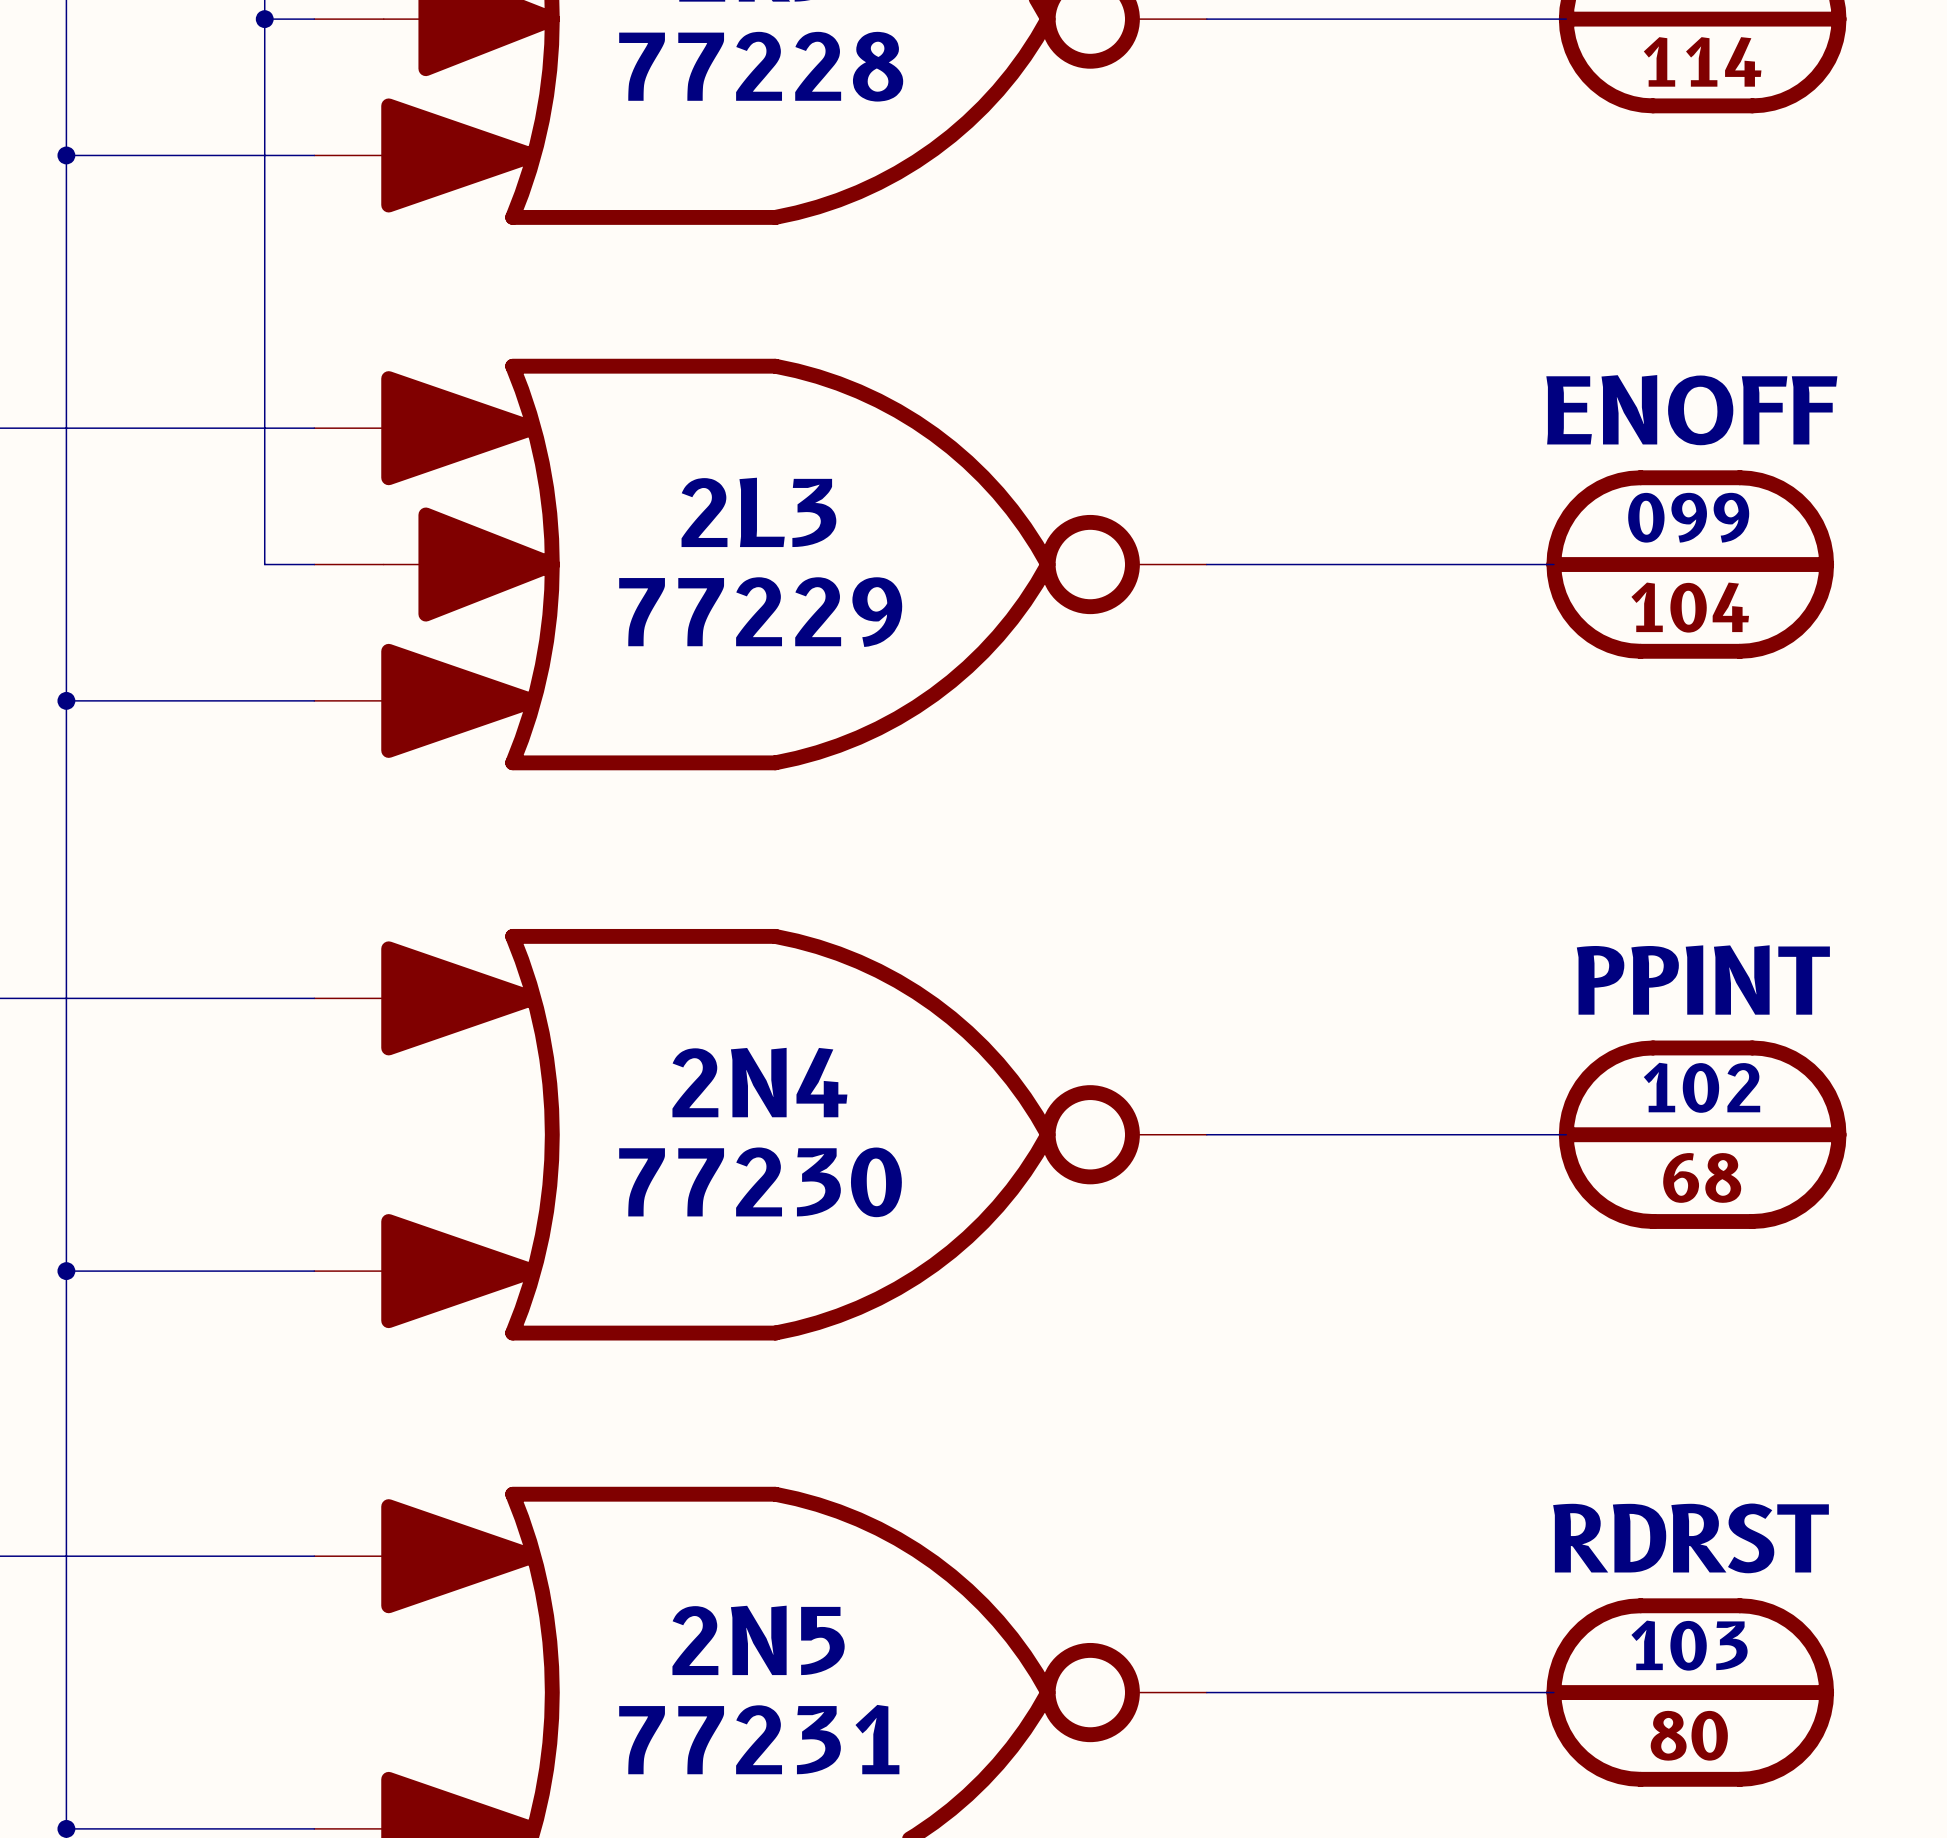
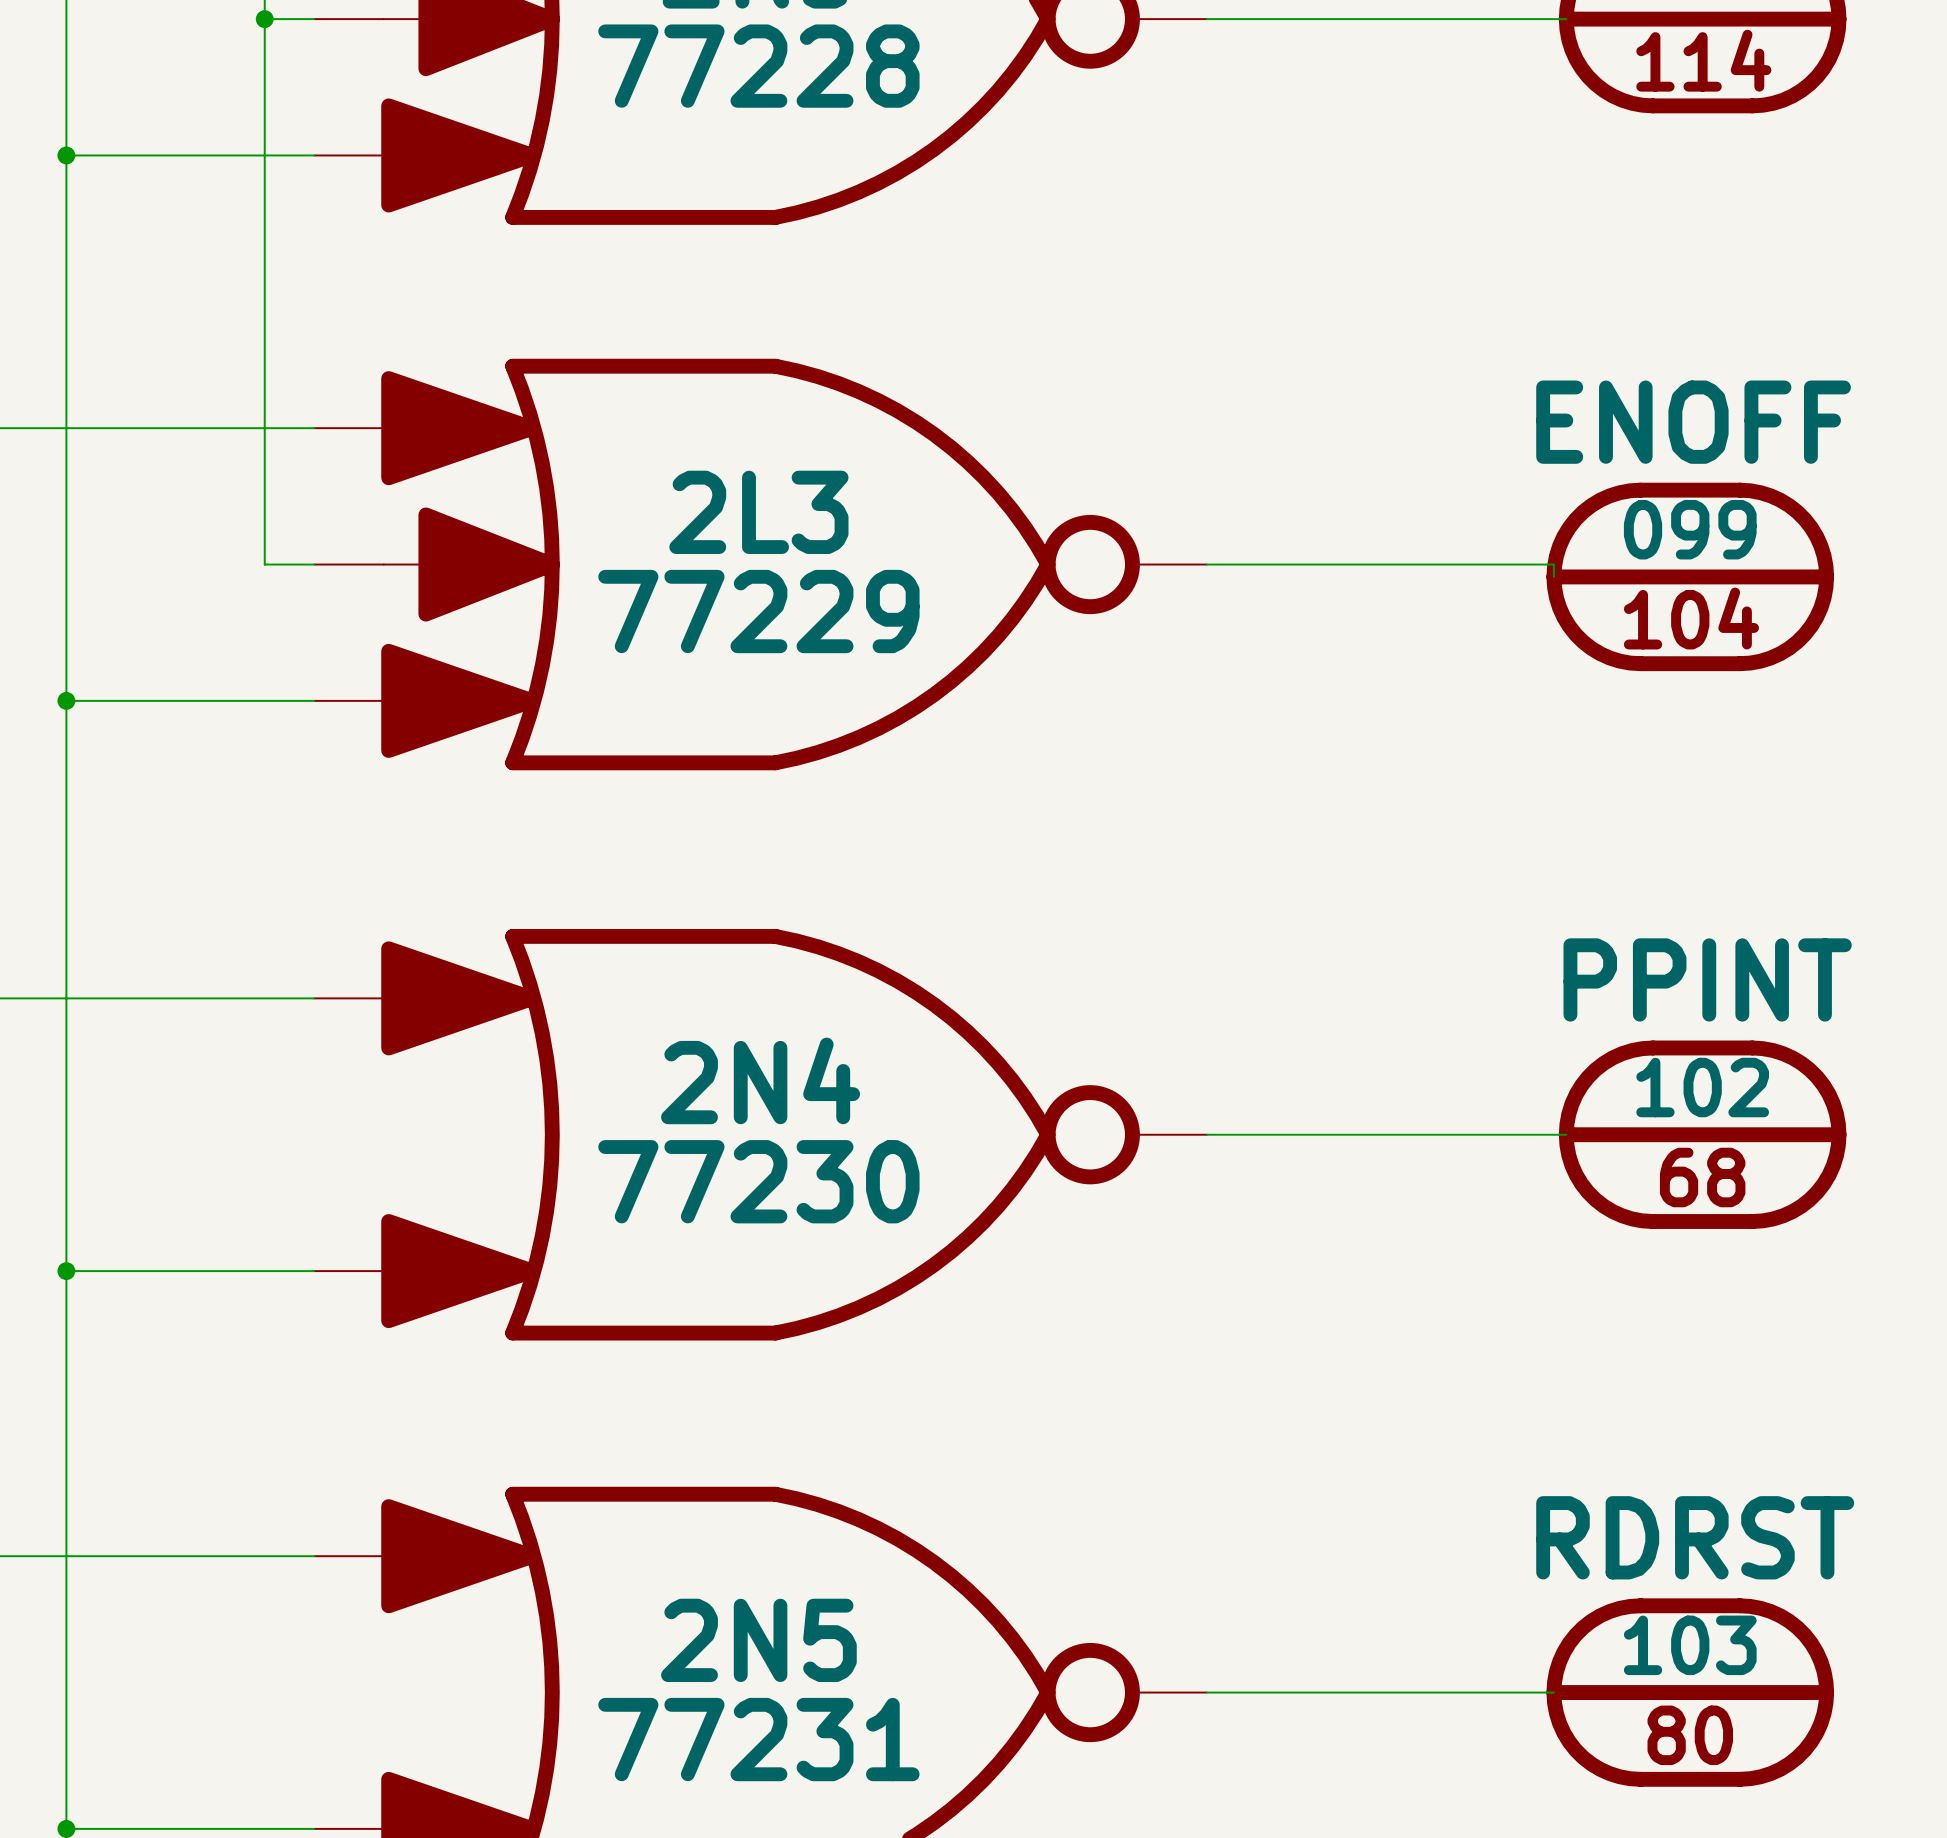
part position: (1690, 564) -> (1690, 576)

